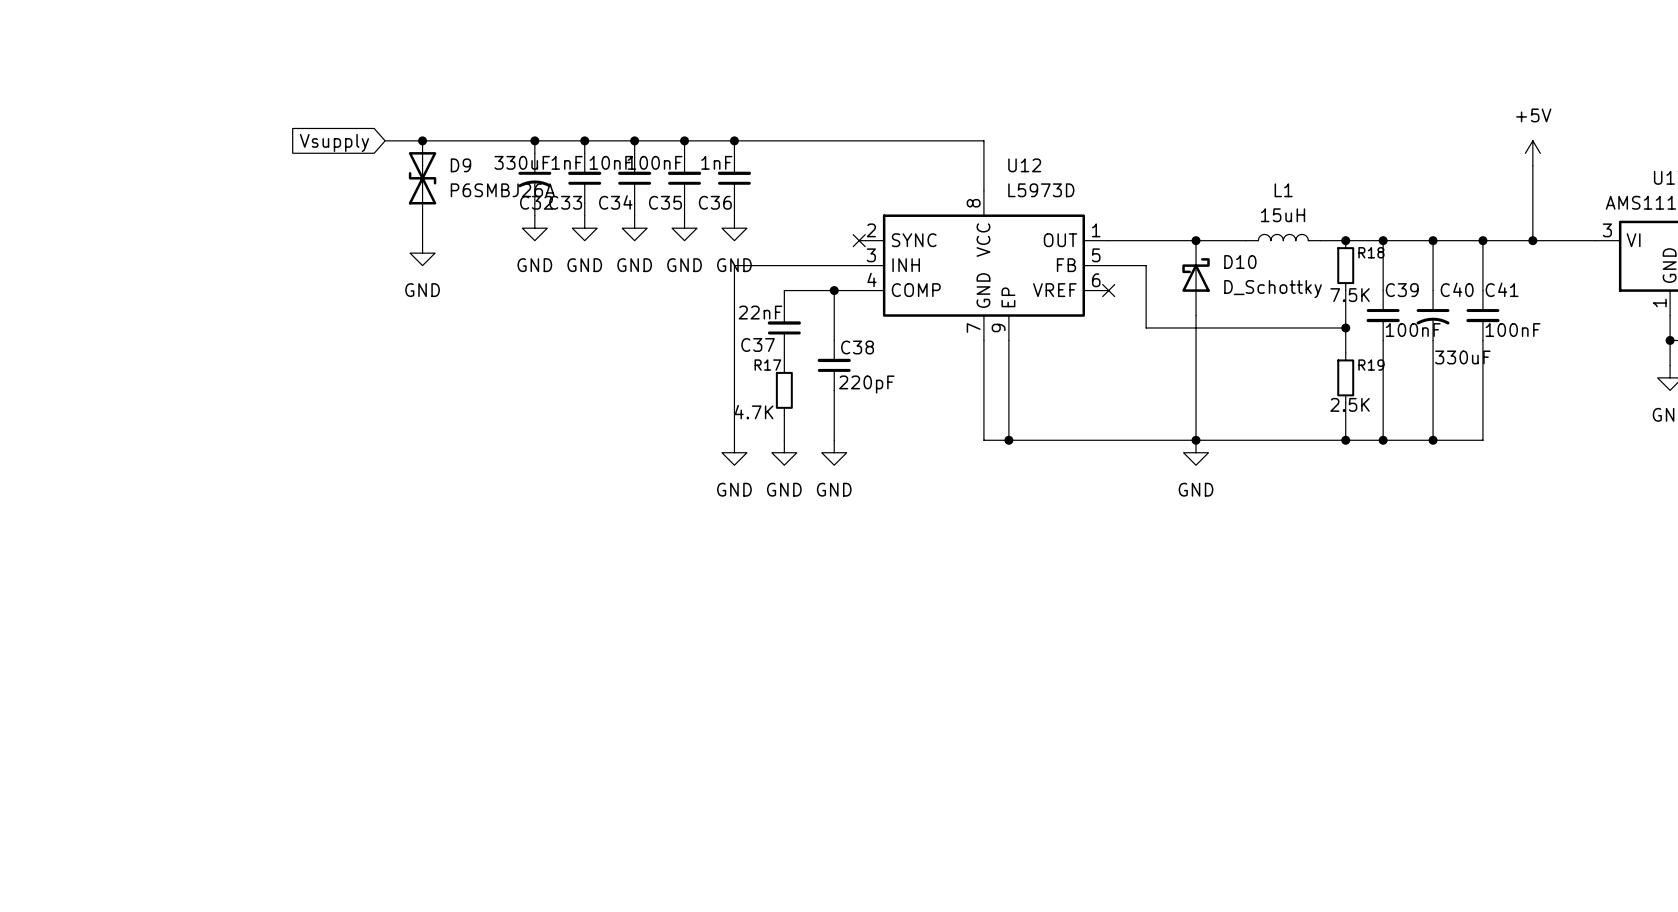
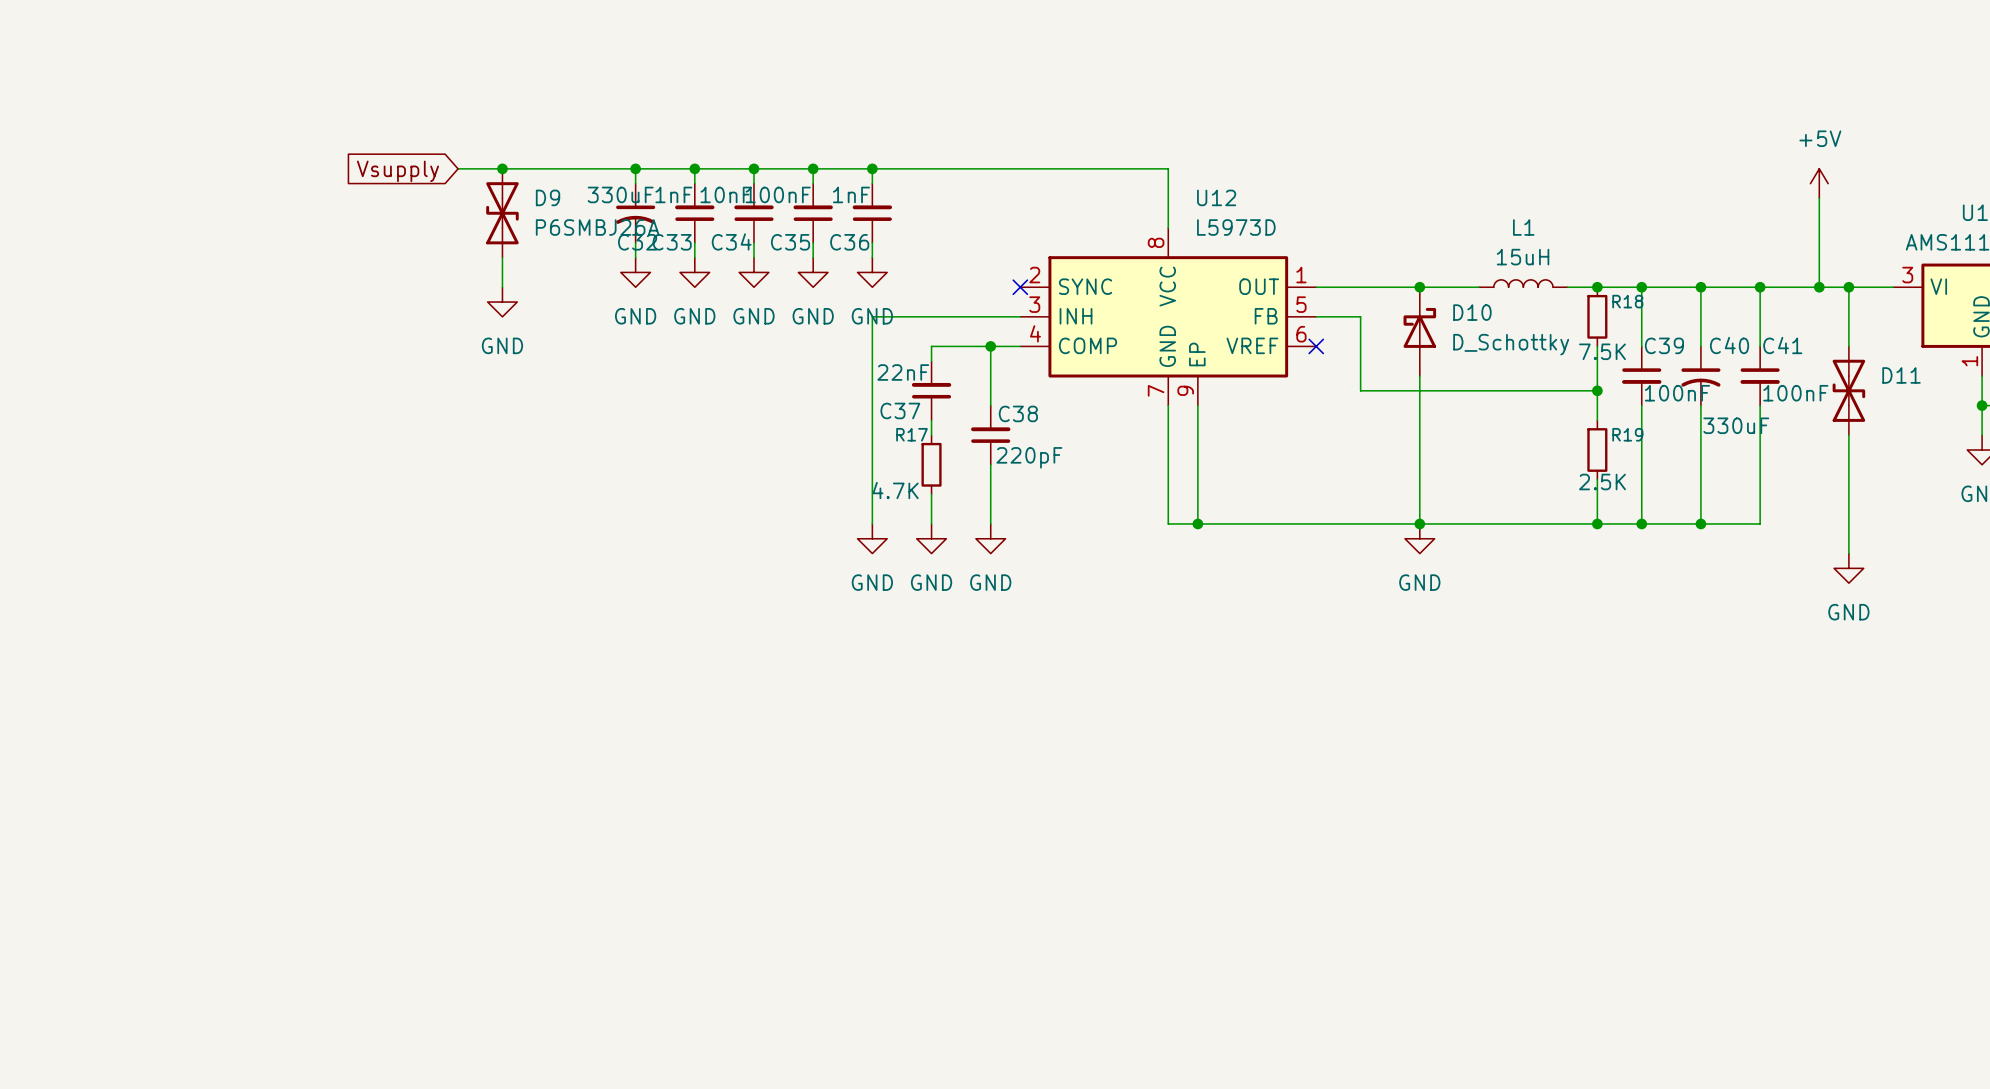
wire: none -> (1848, 287) (1848, 346)
junction: none -> (1848, 287)
D11: none -> (1848, 390)
wire: none -> (1848, 435) (1848, 553)
power symbol: none -> GND (1848, 568)

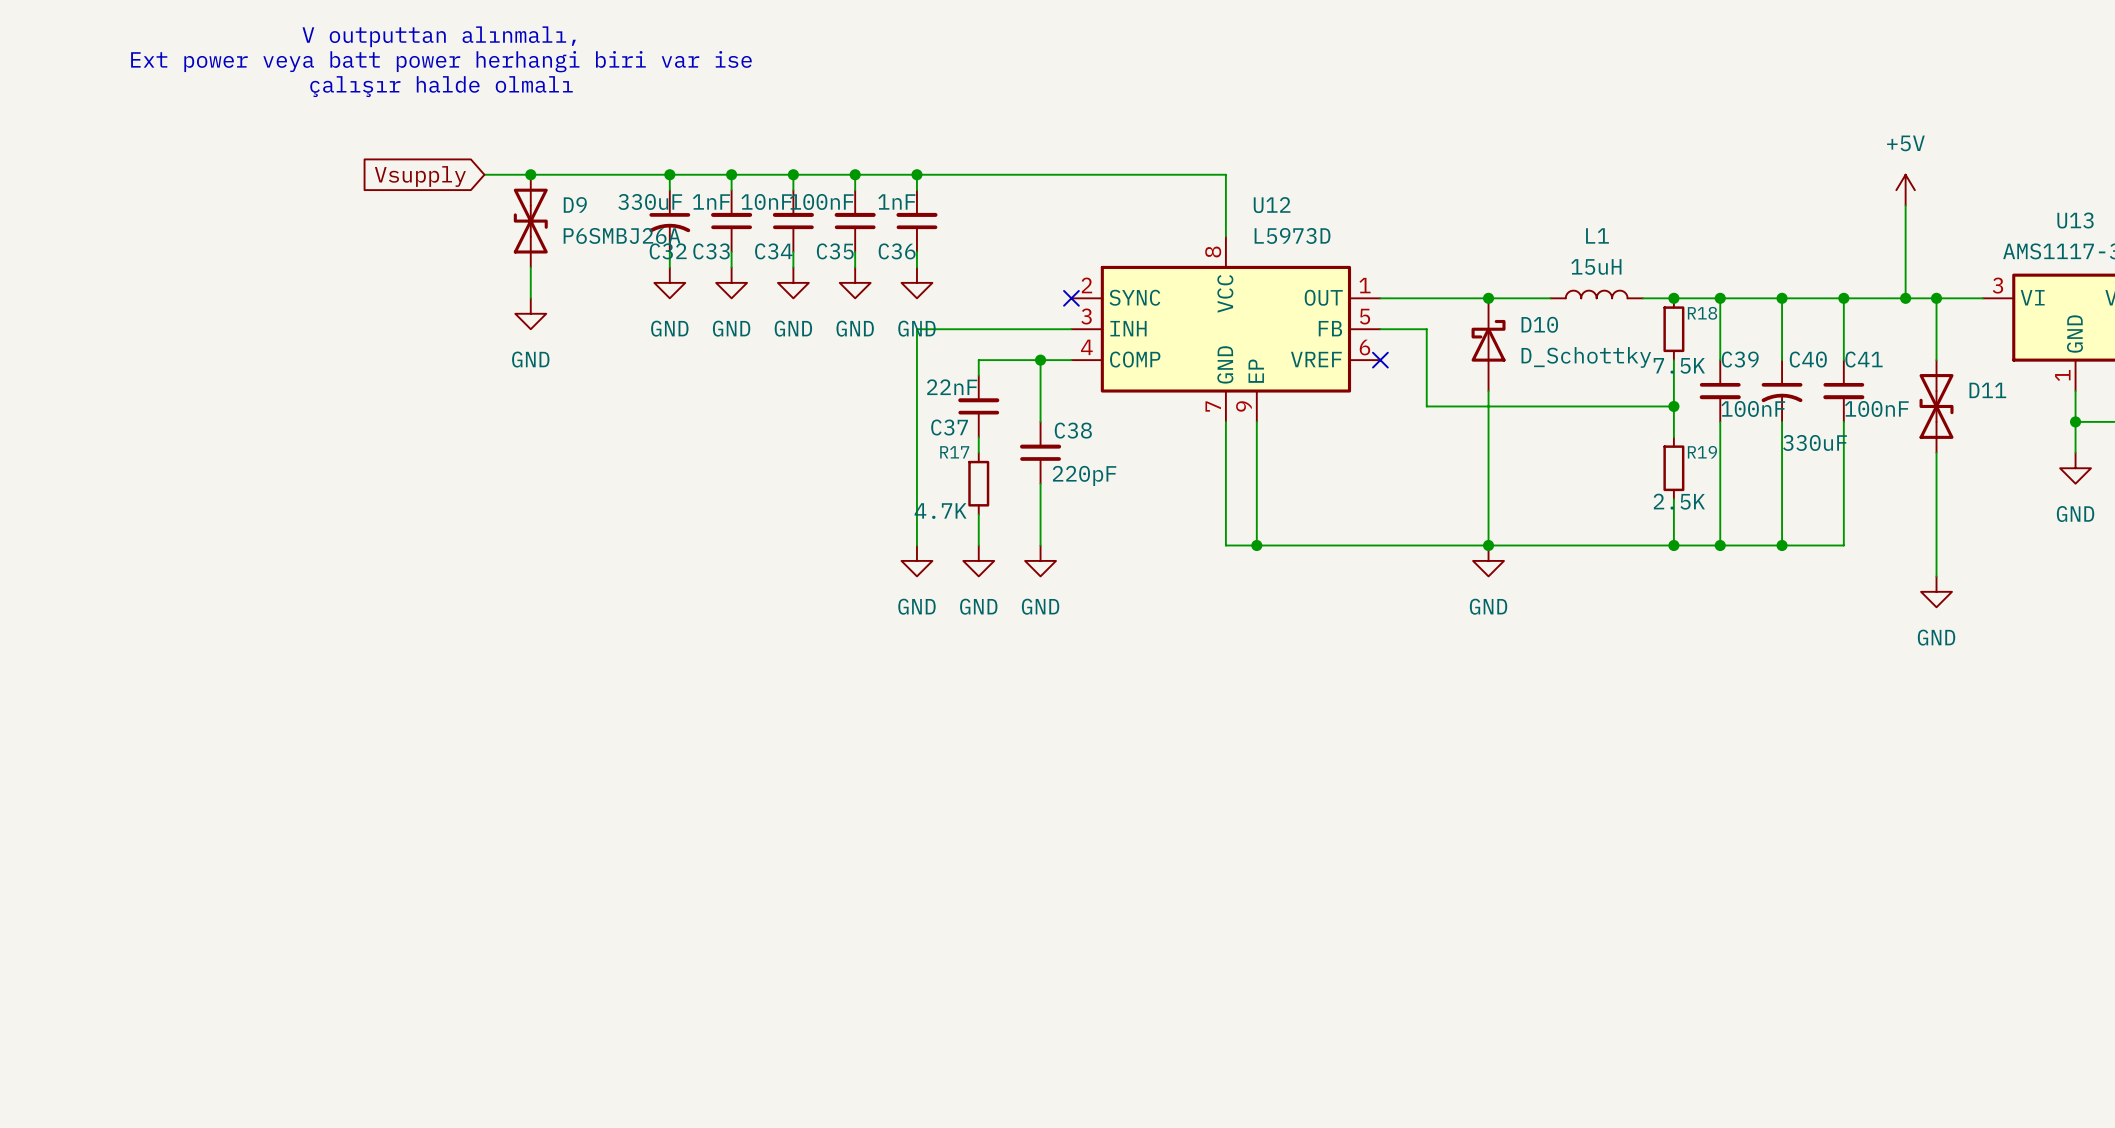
text: none -> V outputtan alınmalı, (439, 36)
text: none -> Ext power veya batt power herhangi biri var ise (441, 61)
text: none -> çalışır halde olmalı (441, 86)

